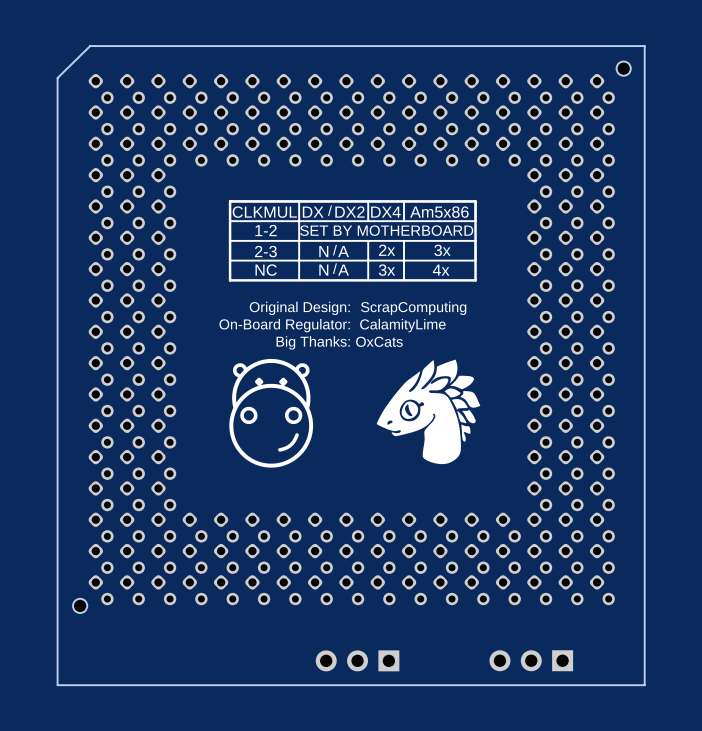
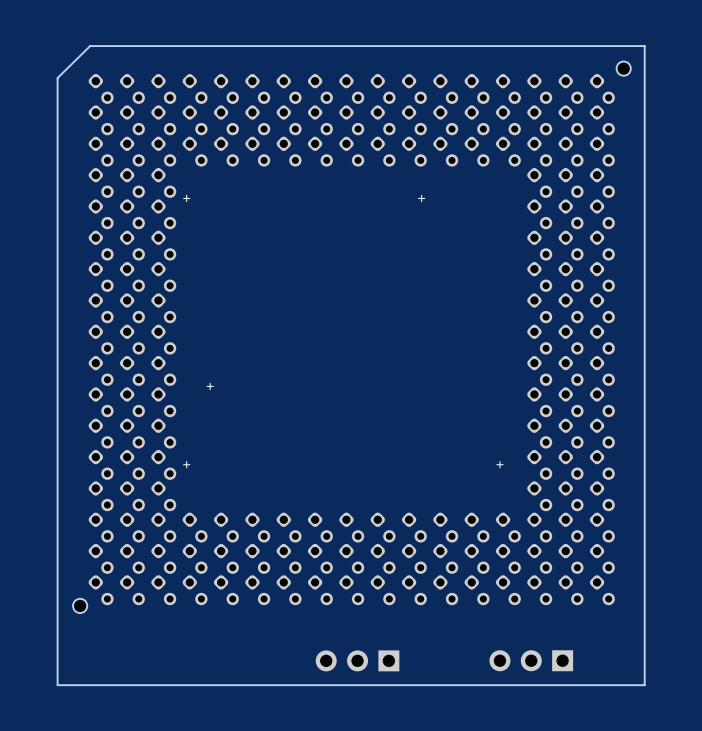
text: none -> + (186, 198)
text: none -> + (421, 198)
line: (299, 201) (299, 280) -> none
line: (368, 201) (368, 221) -> none
line: (403, 201) (403, 221) -> none
line: (475, 201) (475, 221) (230, 221) (230, 201) -> none
line: (475, 201) (230, 201) -> none
line: (475, 201) (475, 280) (230, 280) (230, 201) -> none
text: / (329, 210) -> none
text: CLKMUL (264, 212) -> none
text: DX (313, 212) -> none
text: DX2 (349, 212) -> none
text: DX4 (385, 212) -> none
text: Am5x86 (439, 212) -> none
text: 1-2 (266, 230) -> none
text: SET BY MOTHERBOARD (386, 230) -> none
line: (368, 240) (368, 280) -> none
line: (403, 240) (403, 280) -> none
line: (475, 240) (475, 260) (230, 260) (230, 240) (475, 240) -> none
text: / (334, 250) -> none
text: 2x (387, 250) -> none
text: 3x (442, 250) -> none
text: 2-3 (265, 251) -> none
text: N (323, 251) -> none
text: A (343, 251) -> none
text: / (334, 268) -> none
text: NC (266, 270) -> none
text: N (323, 270) -> none
text: A (343, 270) -> none
text: 3x (386, 270) -> none
text: 4x (441, 270) -> none
text: Original Design: (299, 308) -> none
text: ScrapComputing (413, 308) -> none
text: On-Board Regulator: (284, 325) -> none
text: CalamityLime (402, 325) -> none
text: OxCats (379, 341) -> none
text: Big Thanks: (313, 342) -> none
drawing: [229, 358, 314, 468] -> none
drawing: [376, 359, 481, 465] -> none
text: none -> + (210, 386)
text: none -> + (186, 464)
text: none -> + (499, 464)

